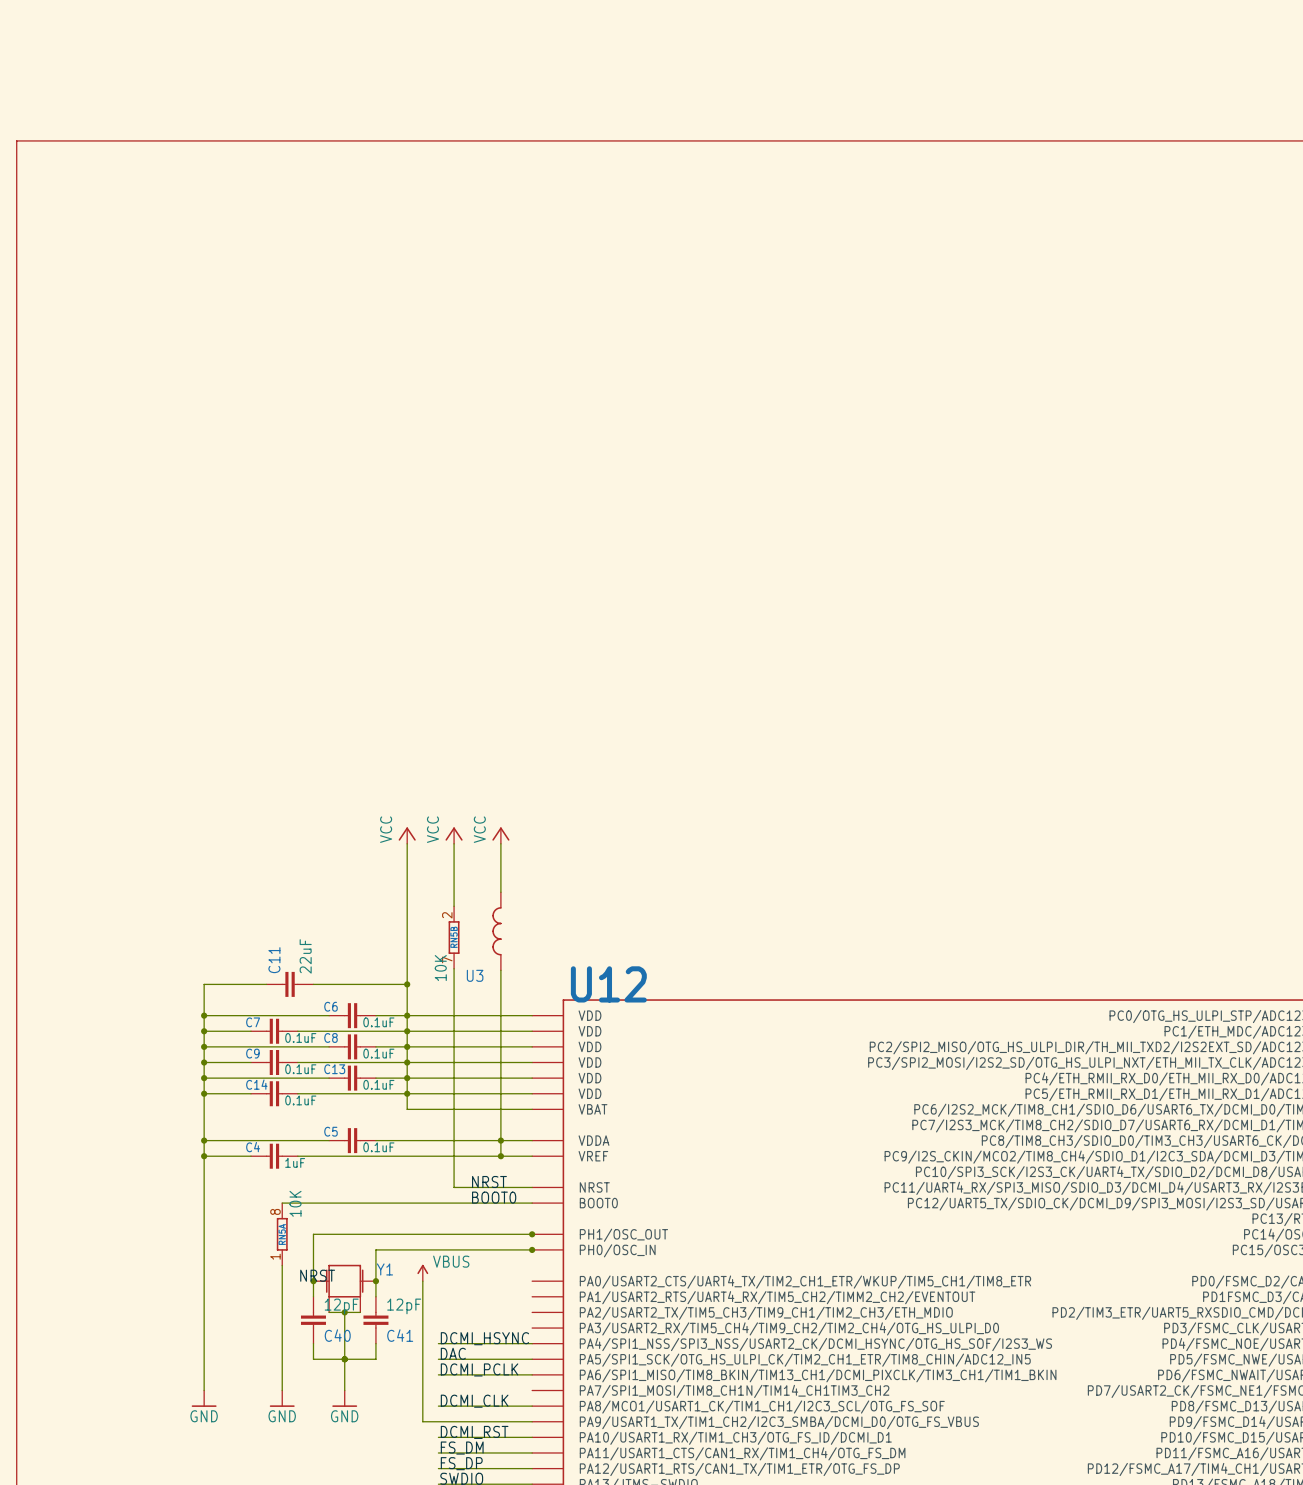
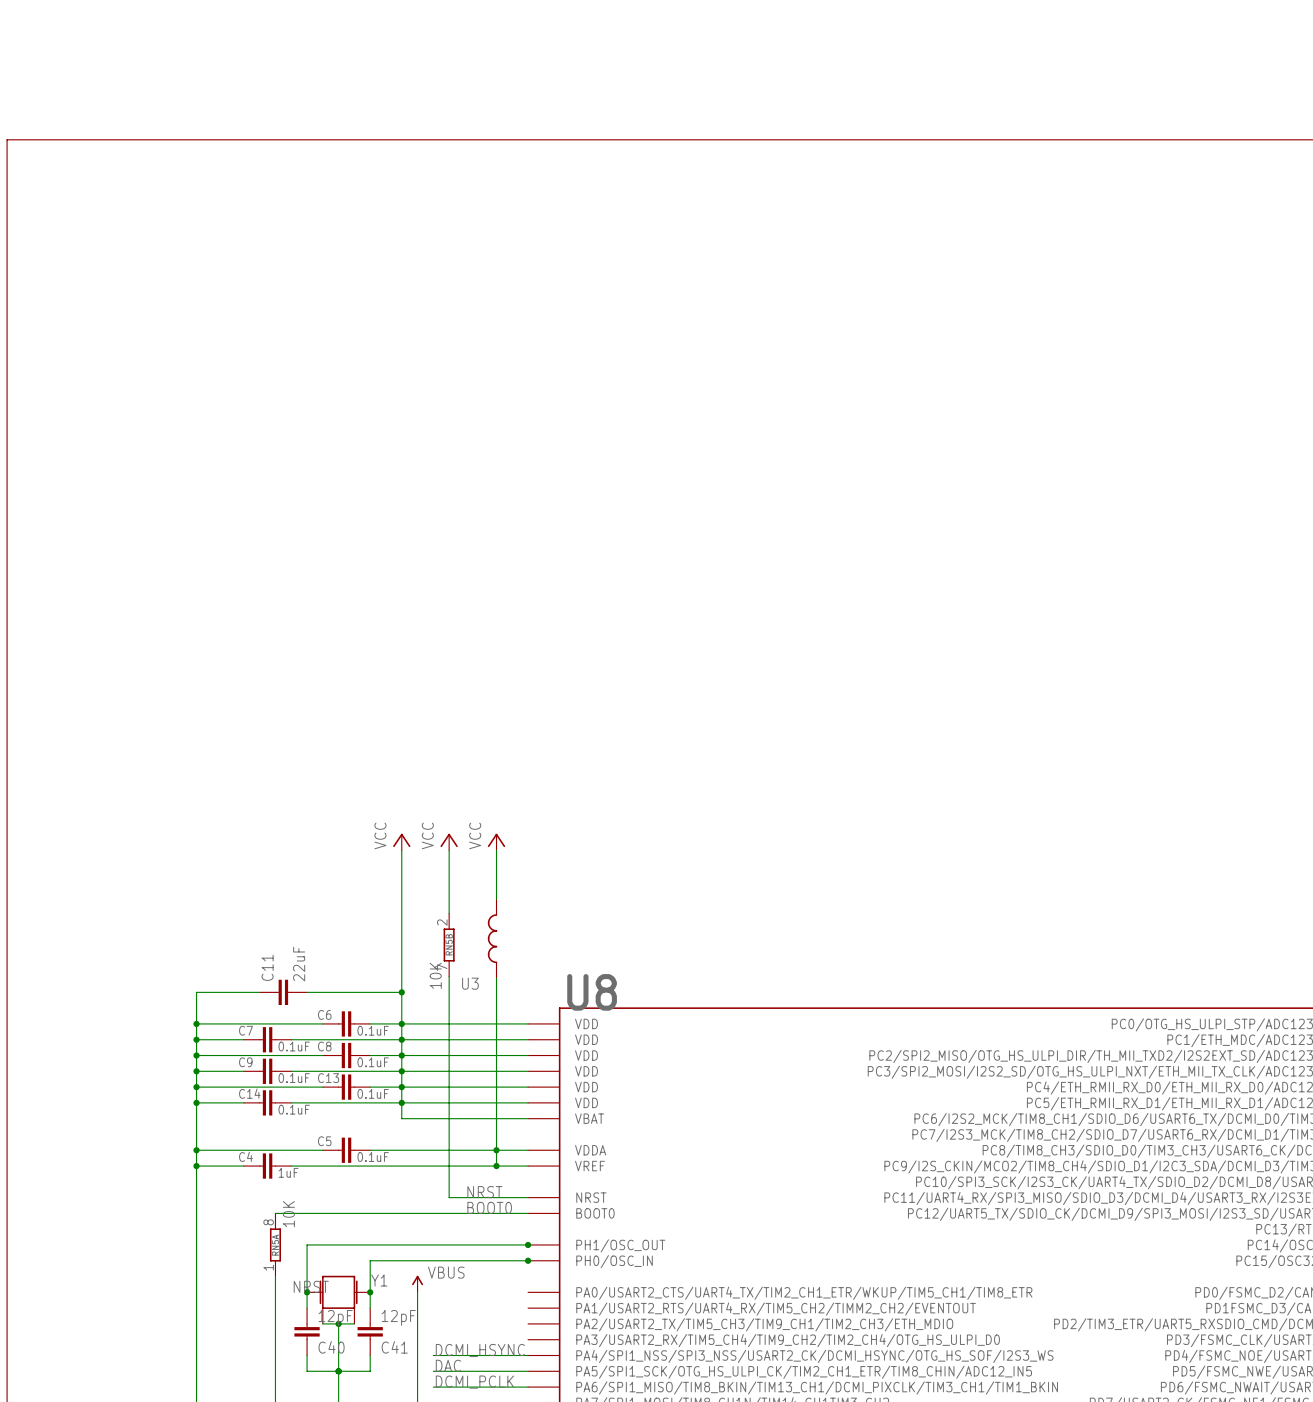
U12 name: U12 (608, 984) -> U8 (592, 992)

